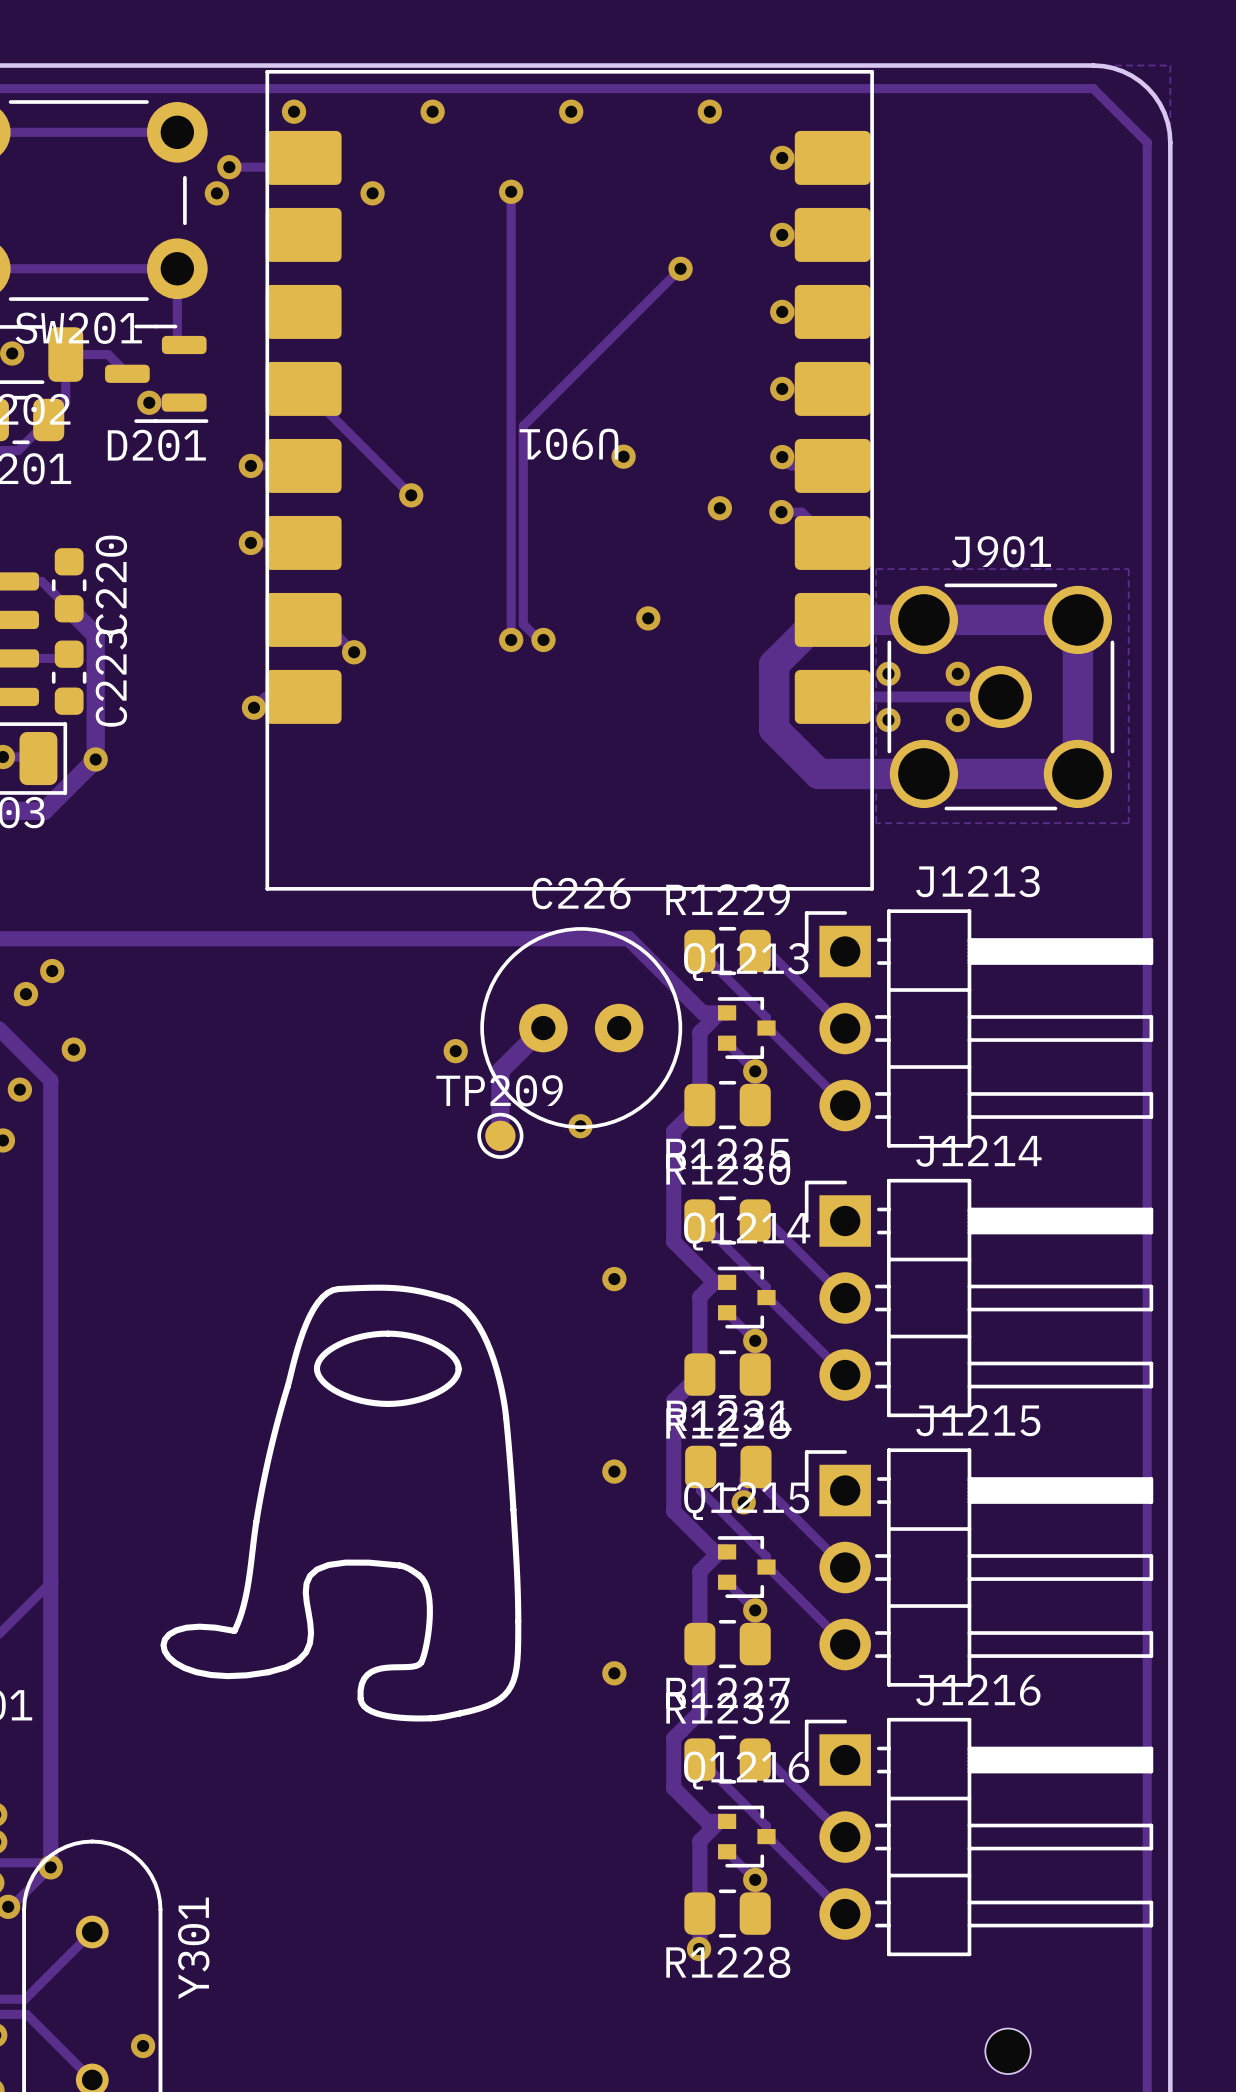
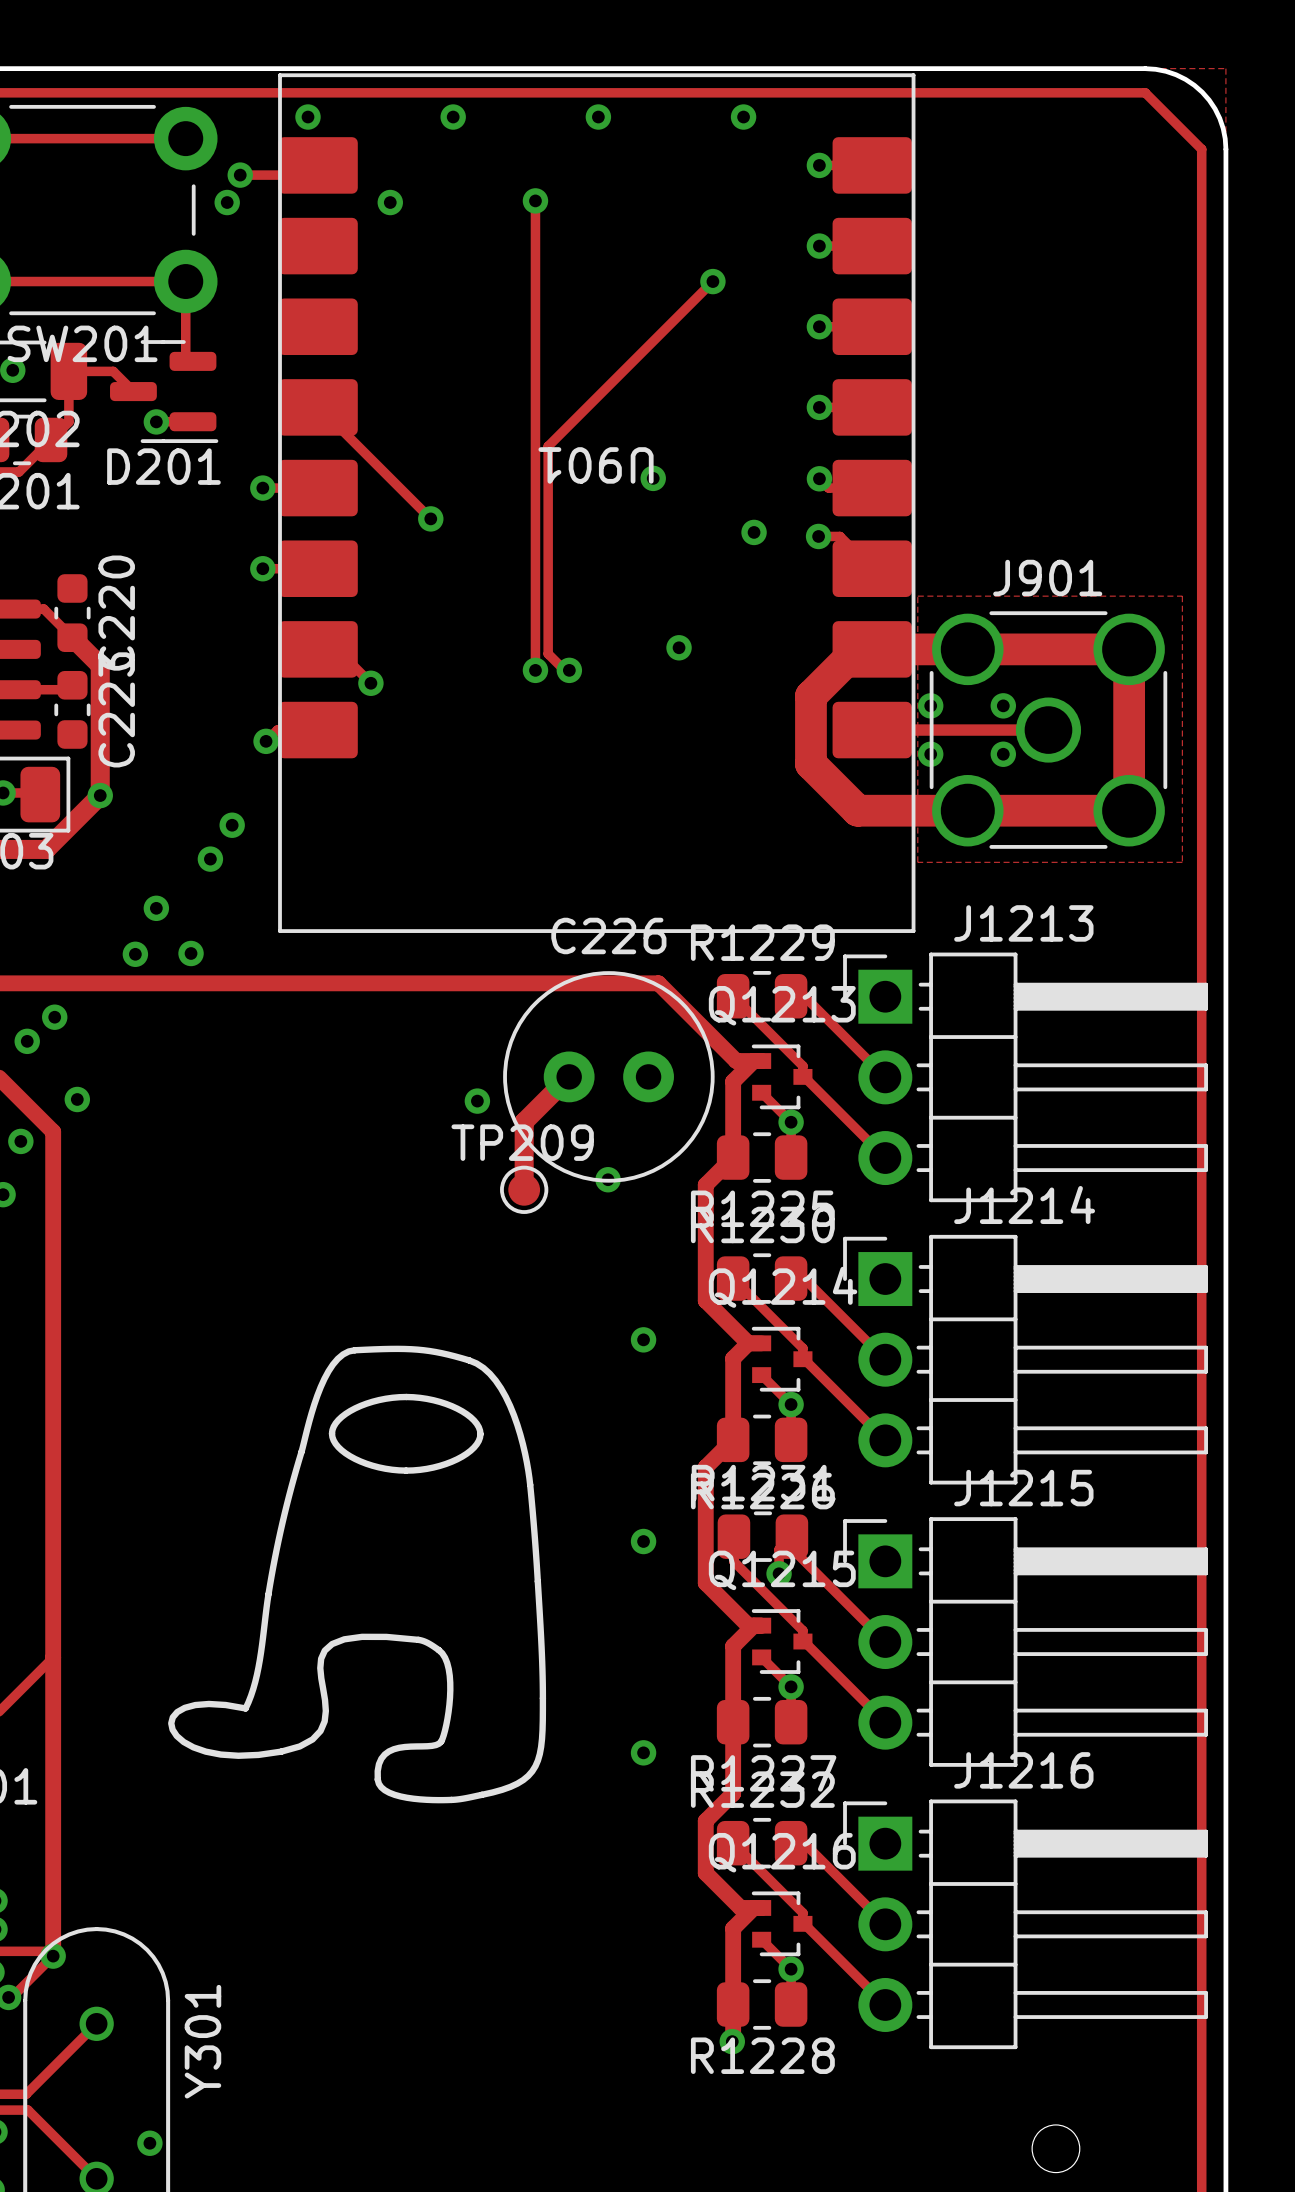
via: none -> (232, 825)
via: none -> (210, 859)
via: none -> (156, 908)
via: none -> (191, 953)
via: none -> (135, 954)

